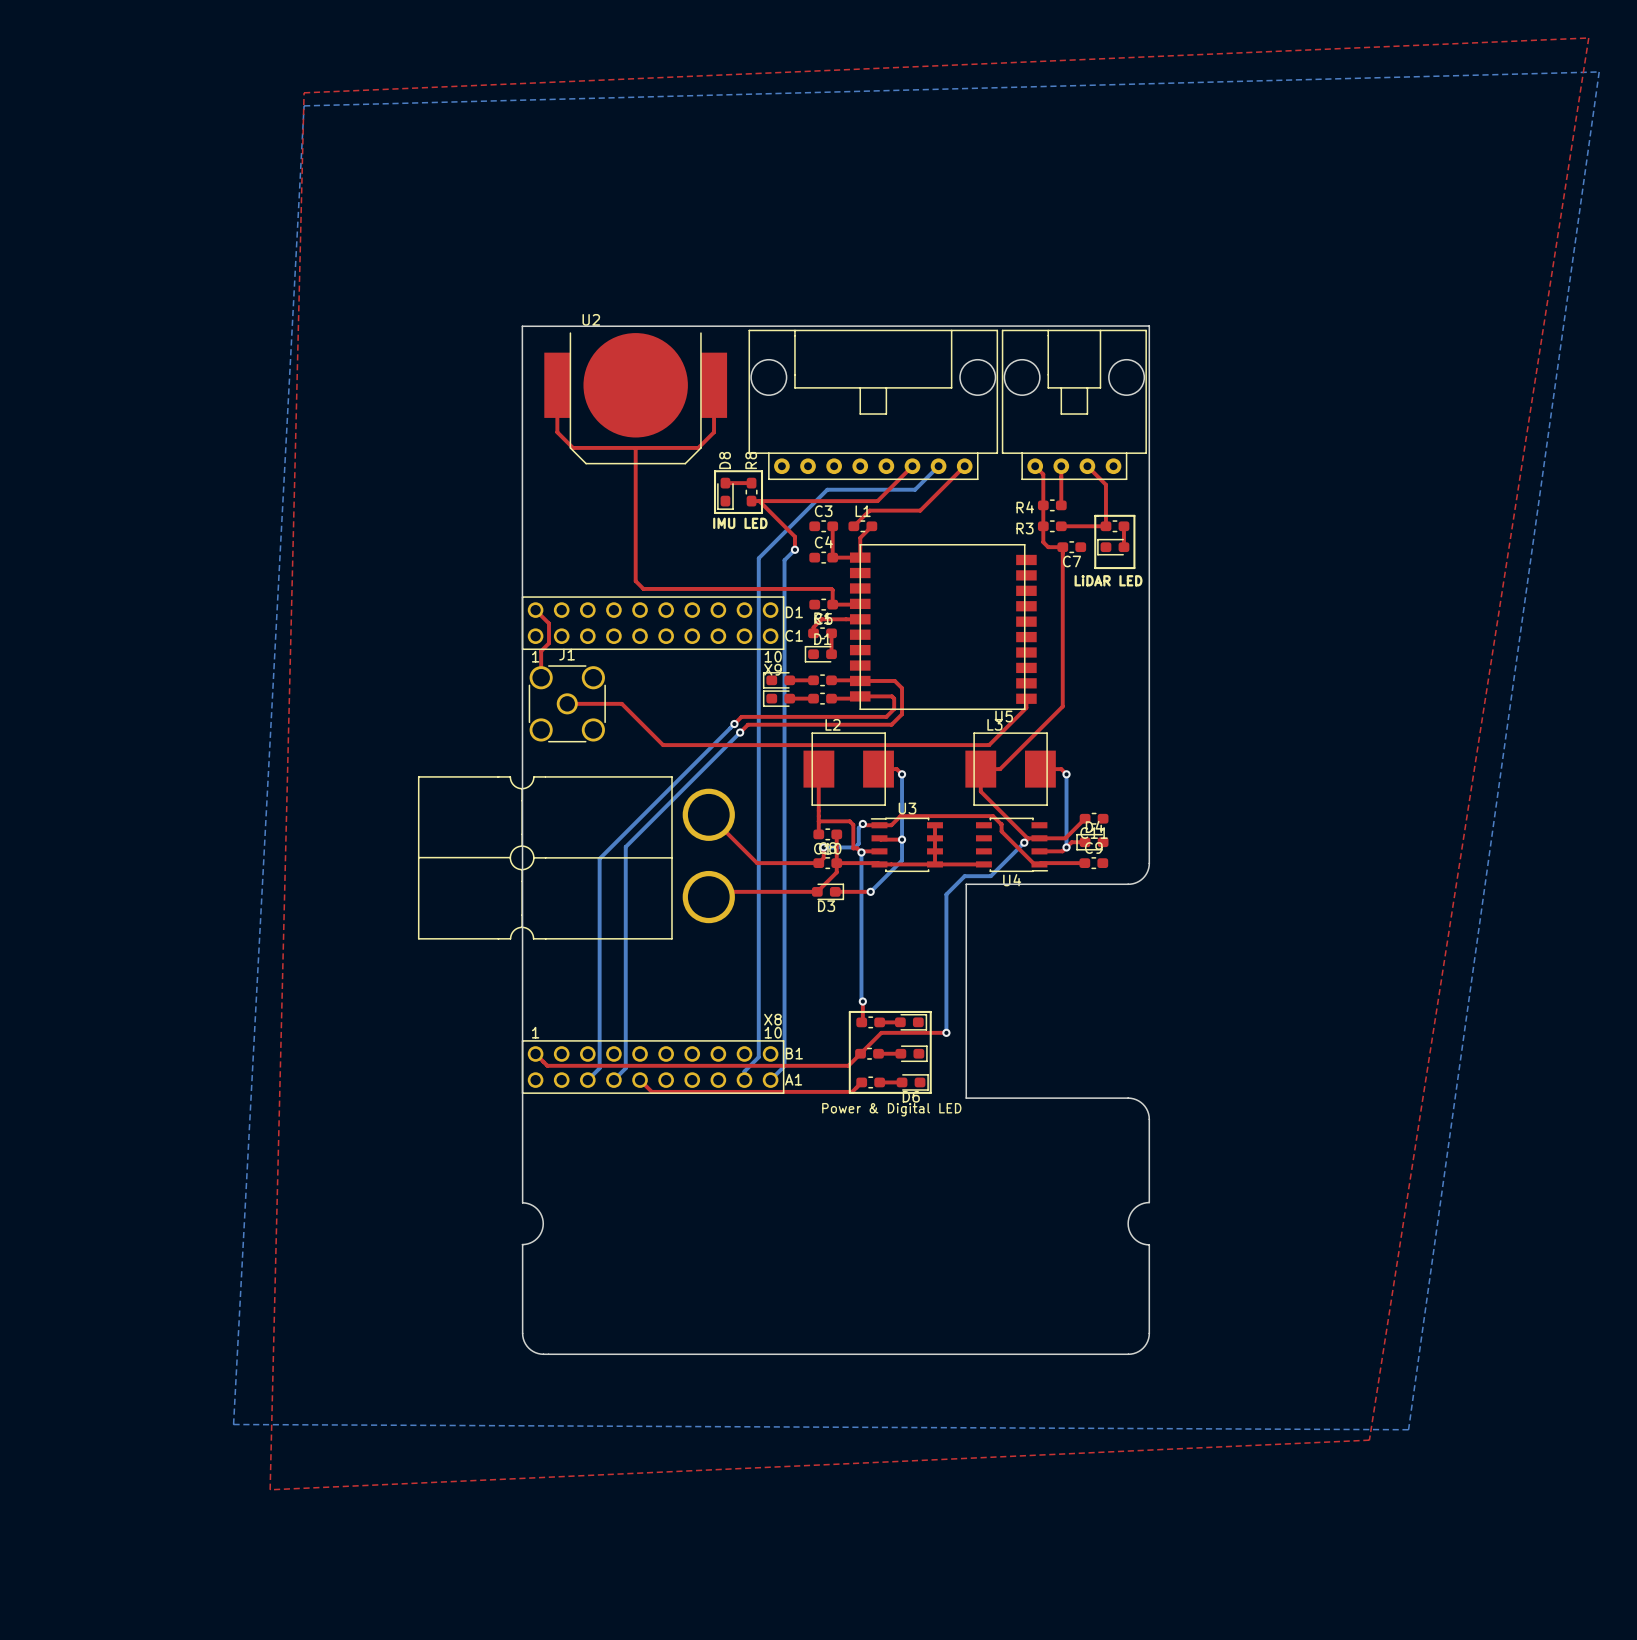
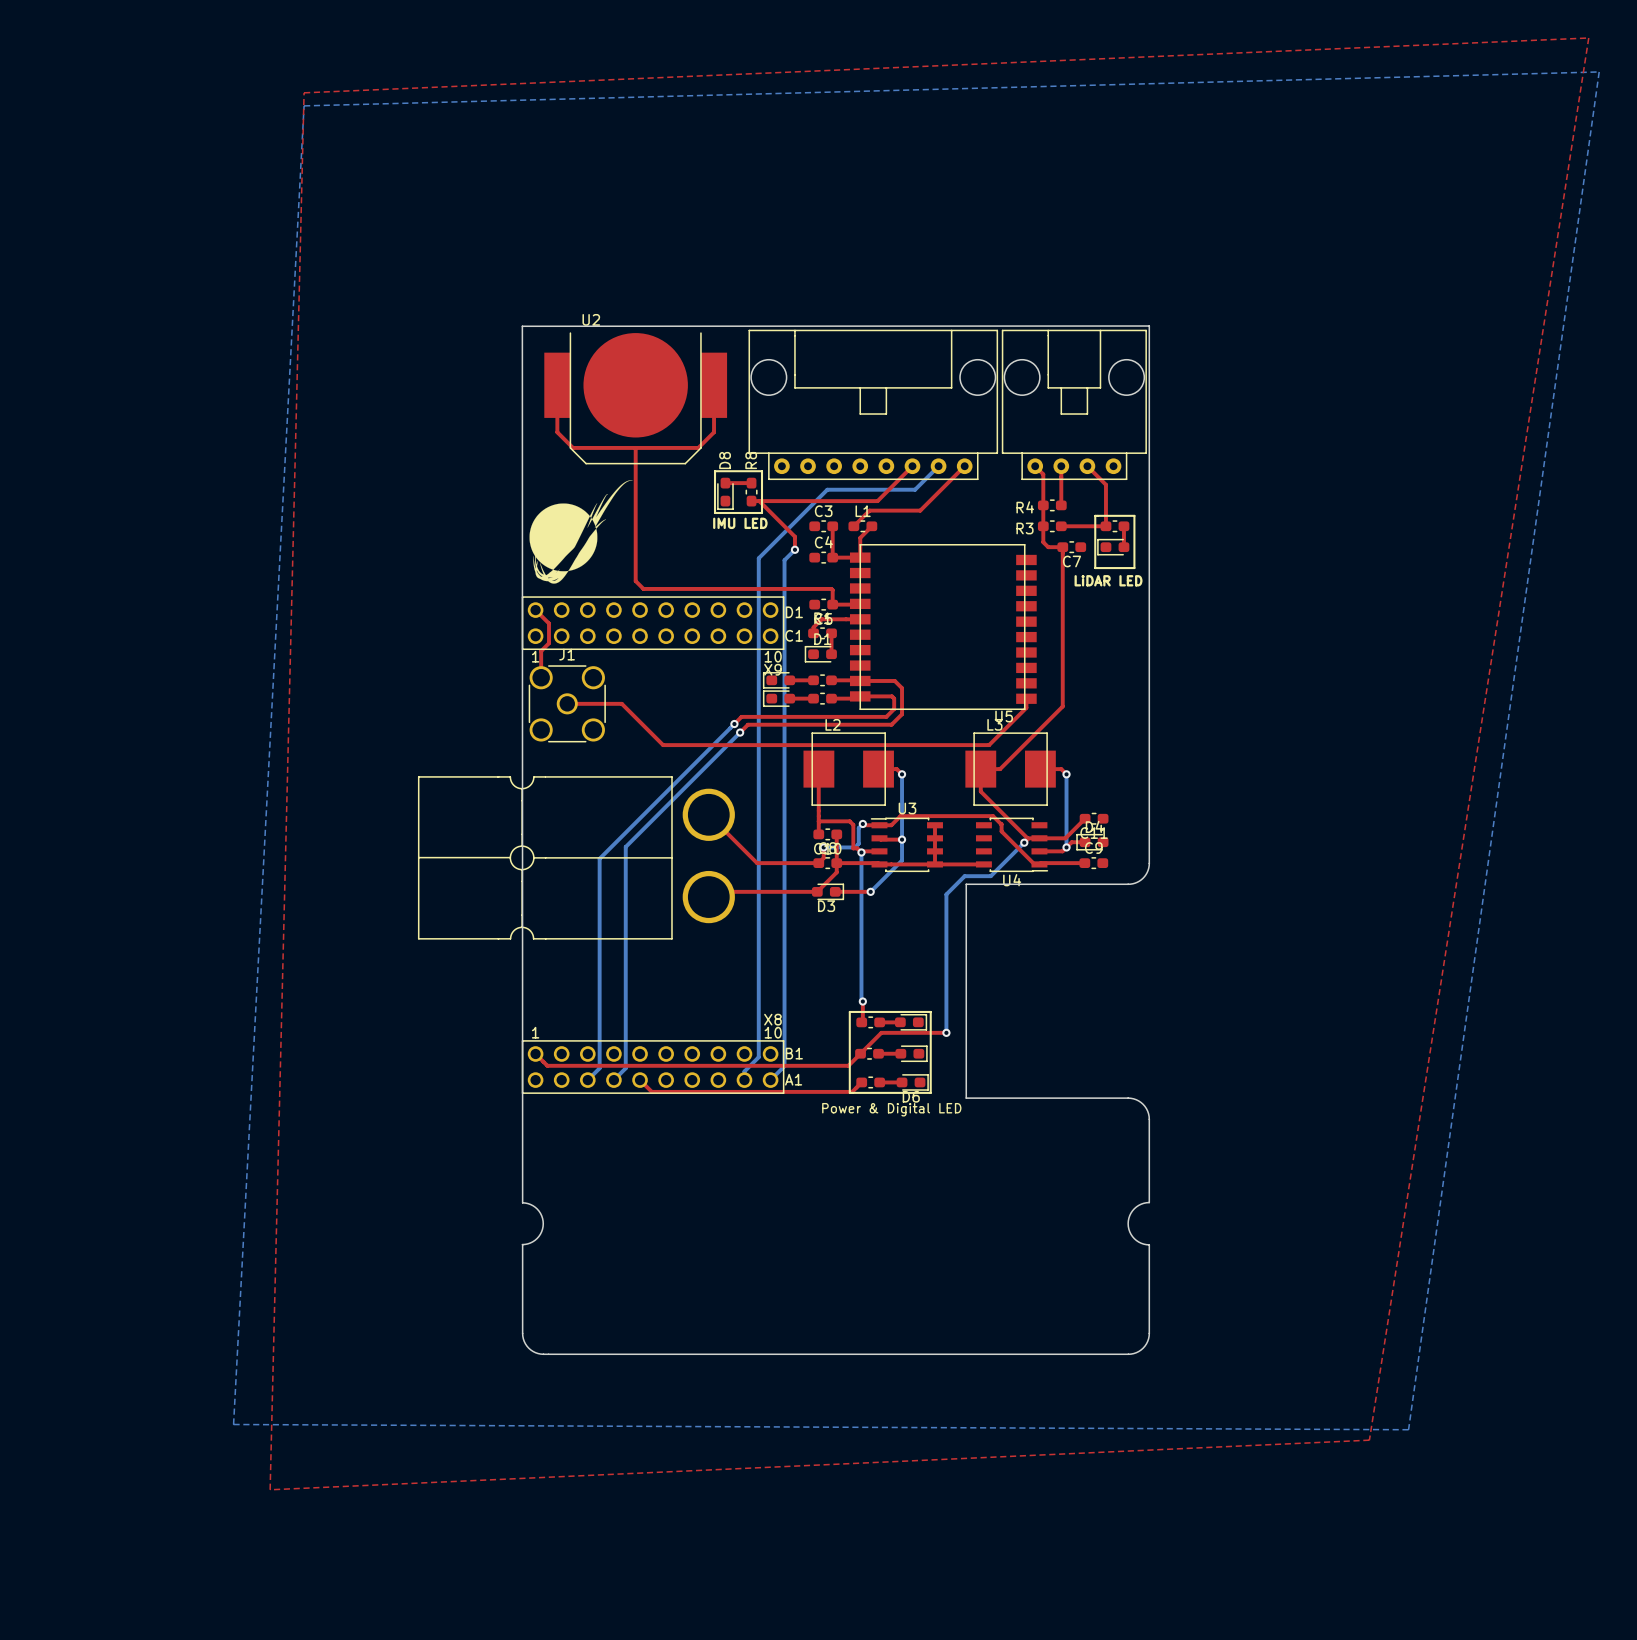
drawing: none -> [529, 480, 633, 584]

